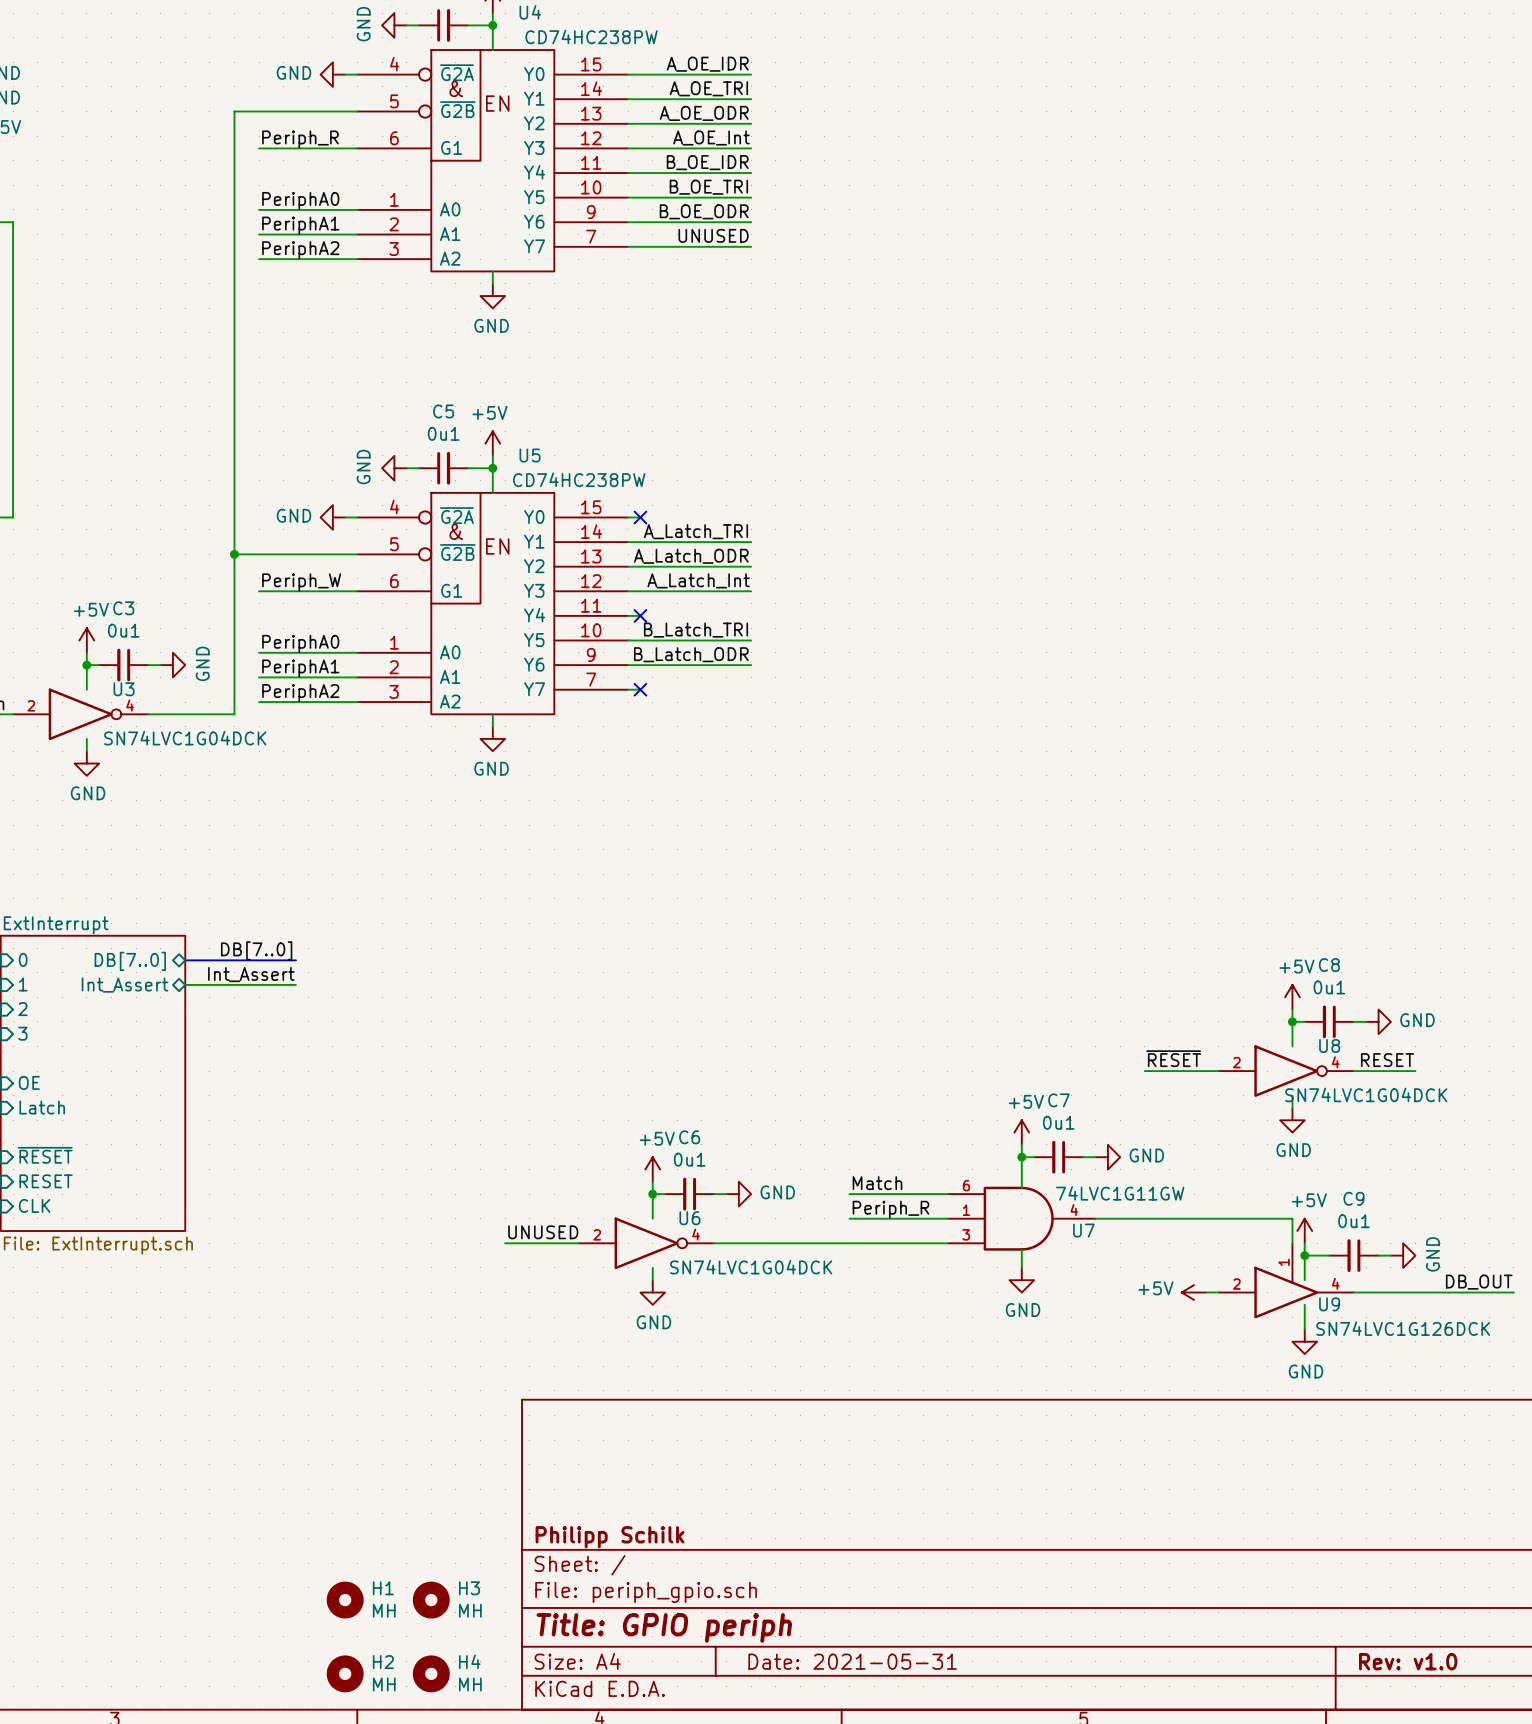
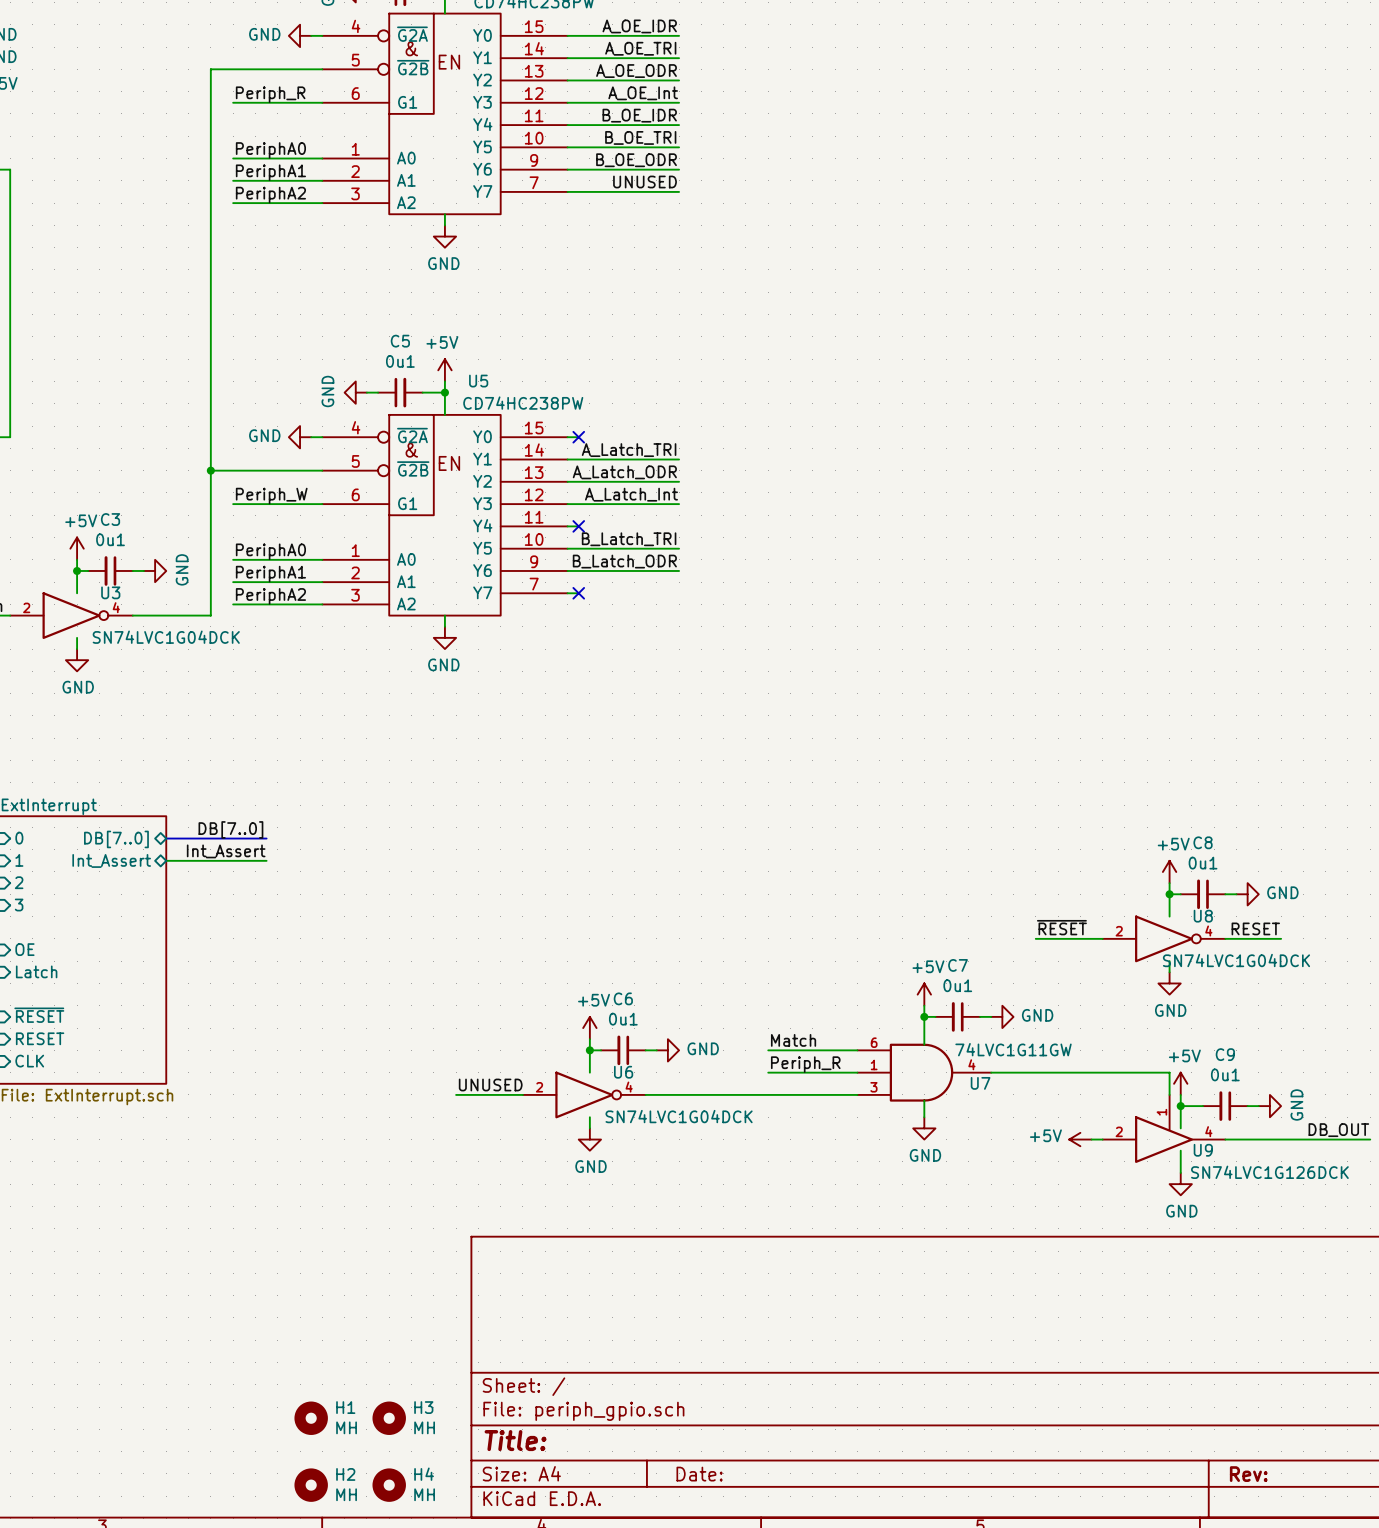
title block: Philipp Schilk (610, 1537) -> none
title block: Title: GPIO periph (664, 1627) -> Title: (515, 1440)
title block: Date: 2021-05-31 (852, 1661) -> Date: (699, 1474)
title block: Rev: v1.0 (1408, 1661) -> Rev: (1248, 1474)

